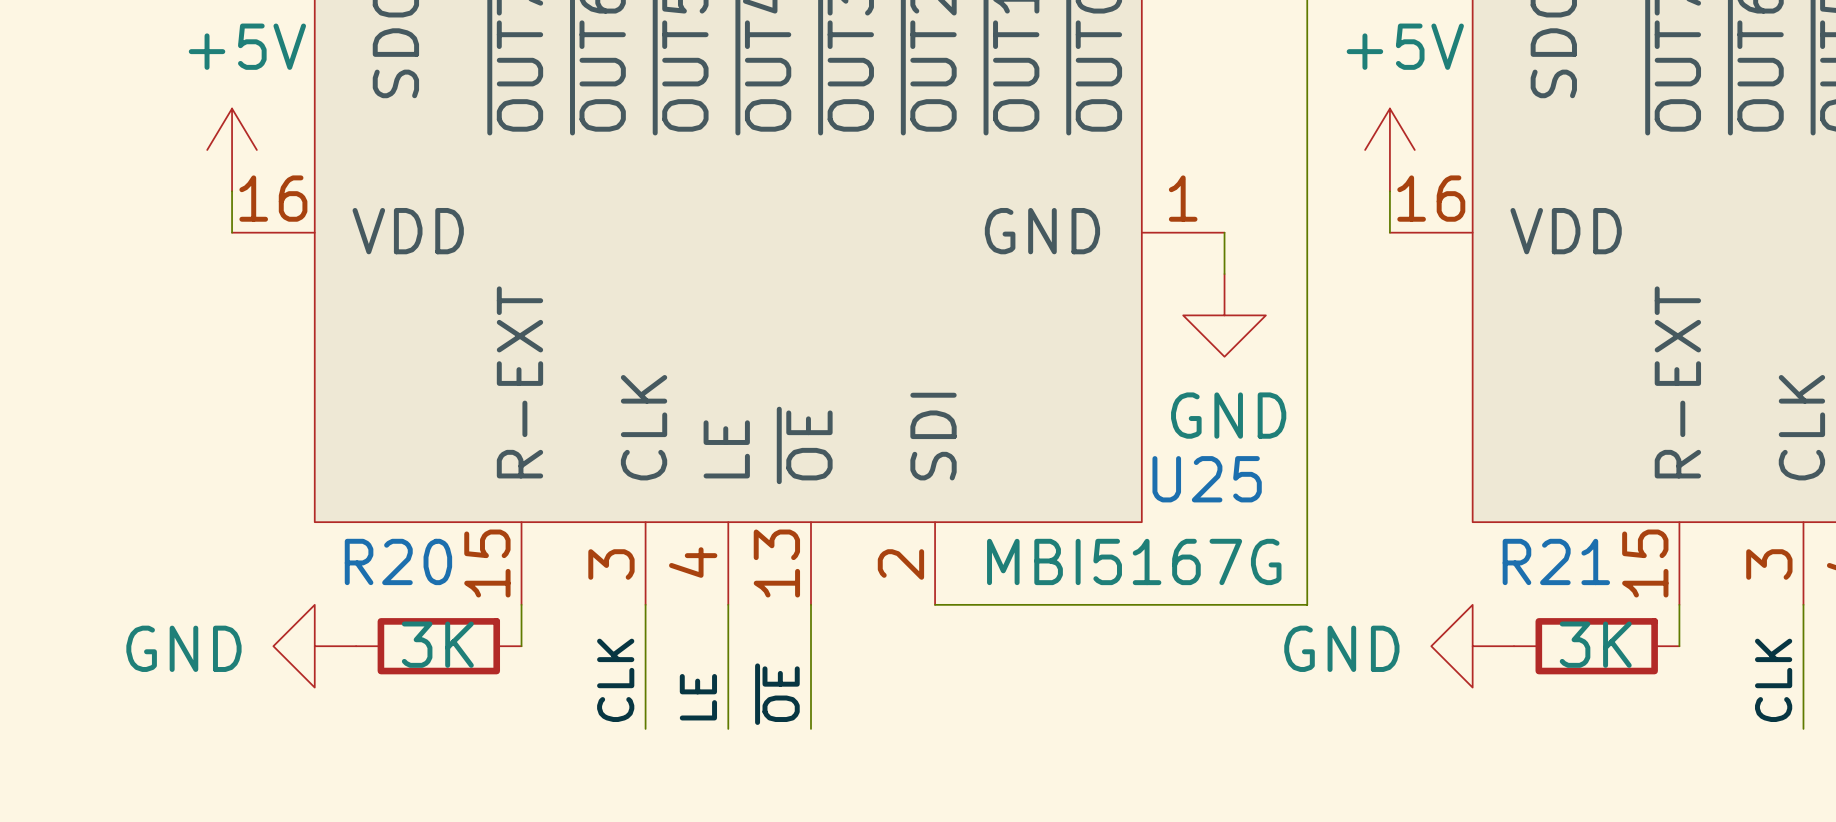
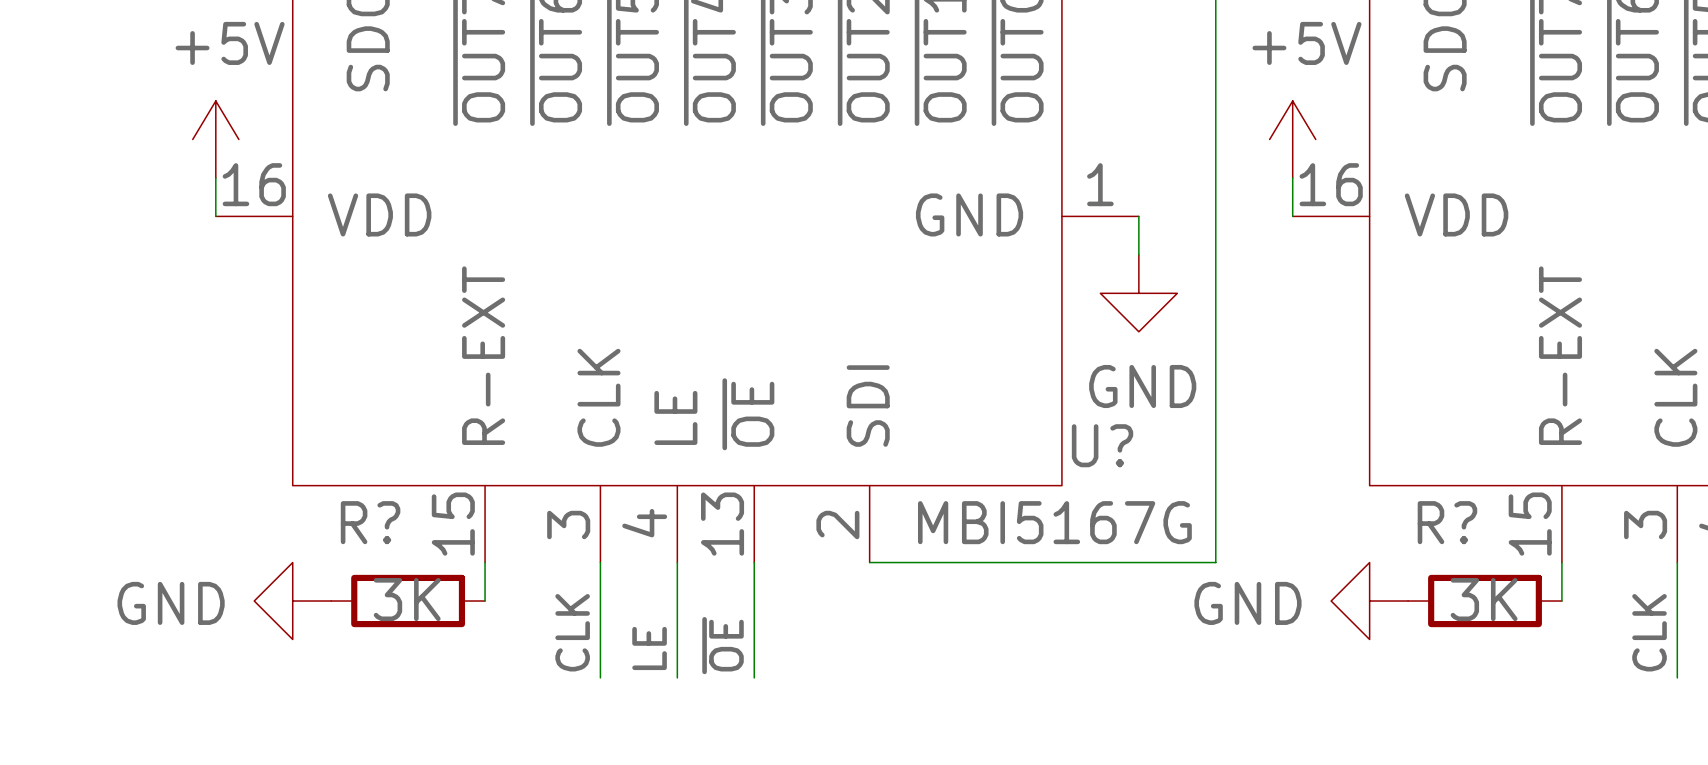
U25 name: U25 (1207, 479) -> U? (1102, 445)
R20 name: R20 (398, 561) -> R? (370, 522)
R21 name: R21 (1556, 561) -> R? (1447, 522)

